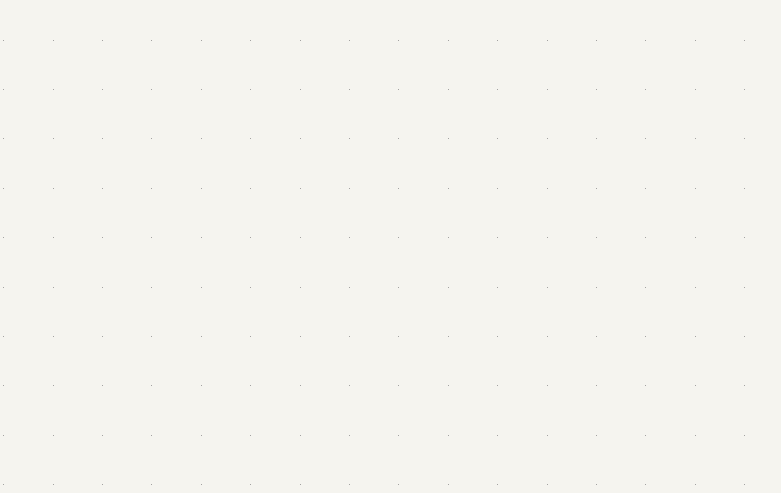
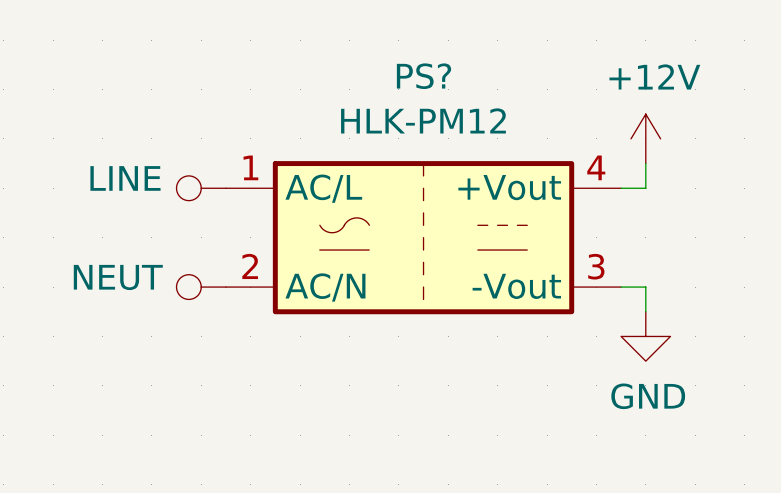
power symbol: none -> +12V (645, 138)
wire: none -> (645, 163) (645, 188) (621, 188)
power symbol: none -> LINE (201, 188)
PS?: none -> HLK-PM12 (423, 237)
power symbol: none -> NEUT (201, 287)
wire: none -> (621, 287) (645, 287) (645, 311)
power symbol: none -> GND (645, 336)

